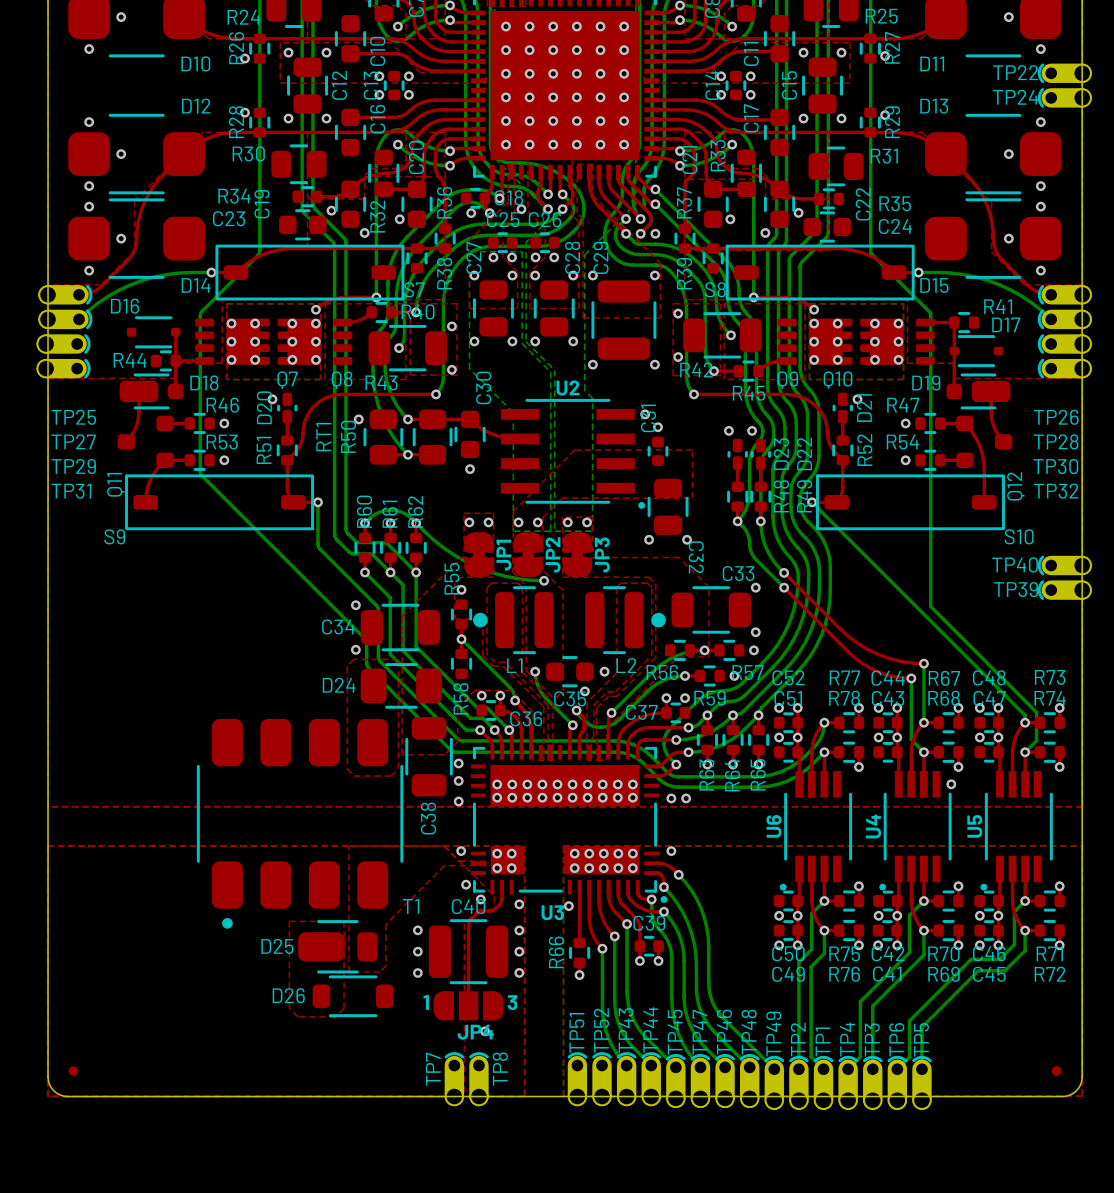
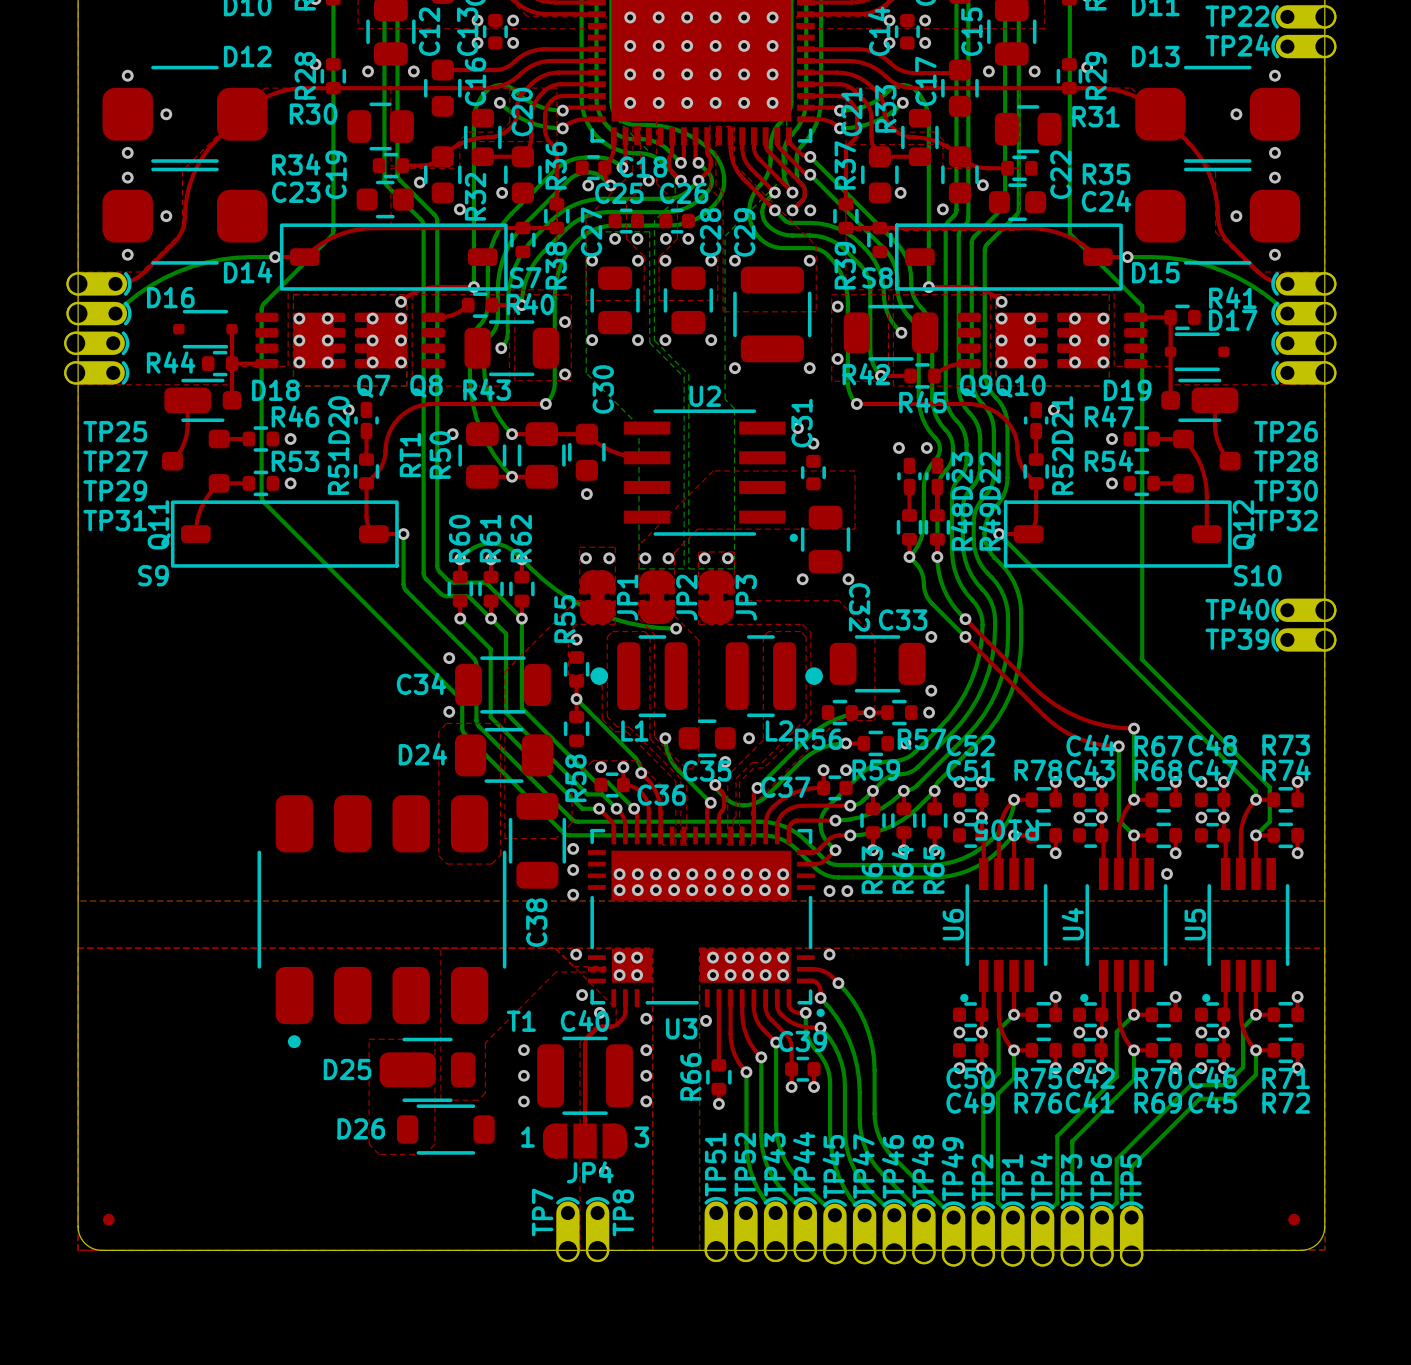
R77 name: R77 (844, 677) -> R105 (1006, 830)

